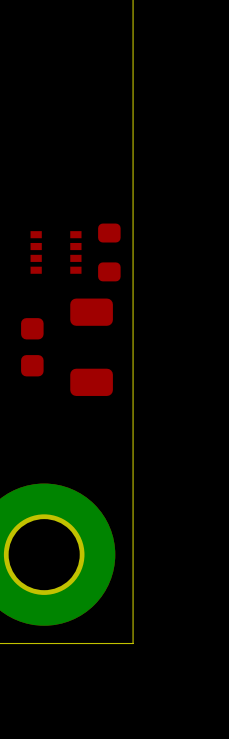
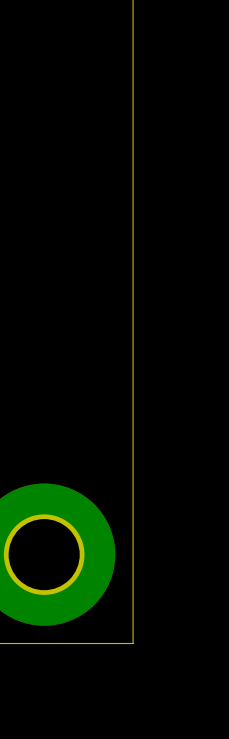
part: (56, 252) -> none
part: (109, 252) -> none
part: (32, 347) -> none
part: (91, 347) -> none

